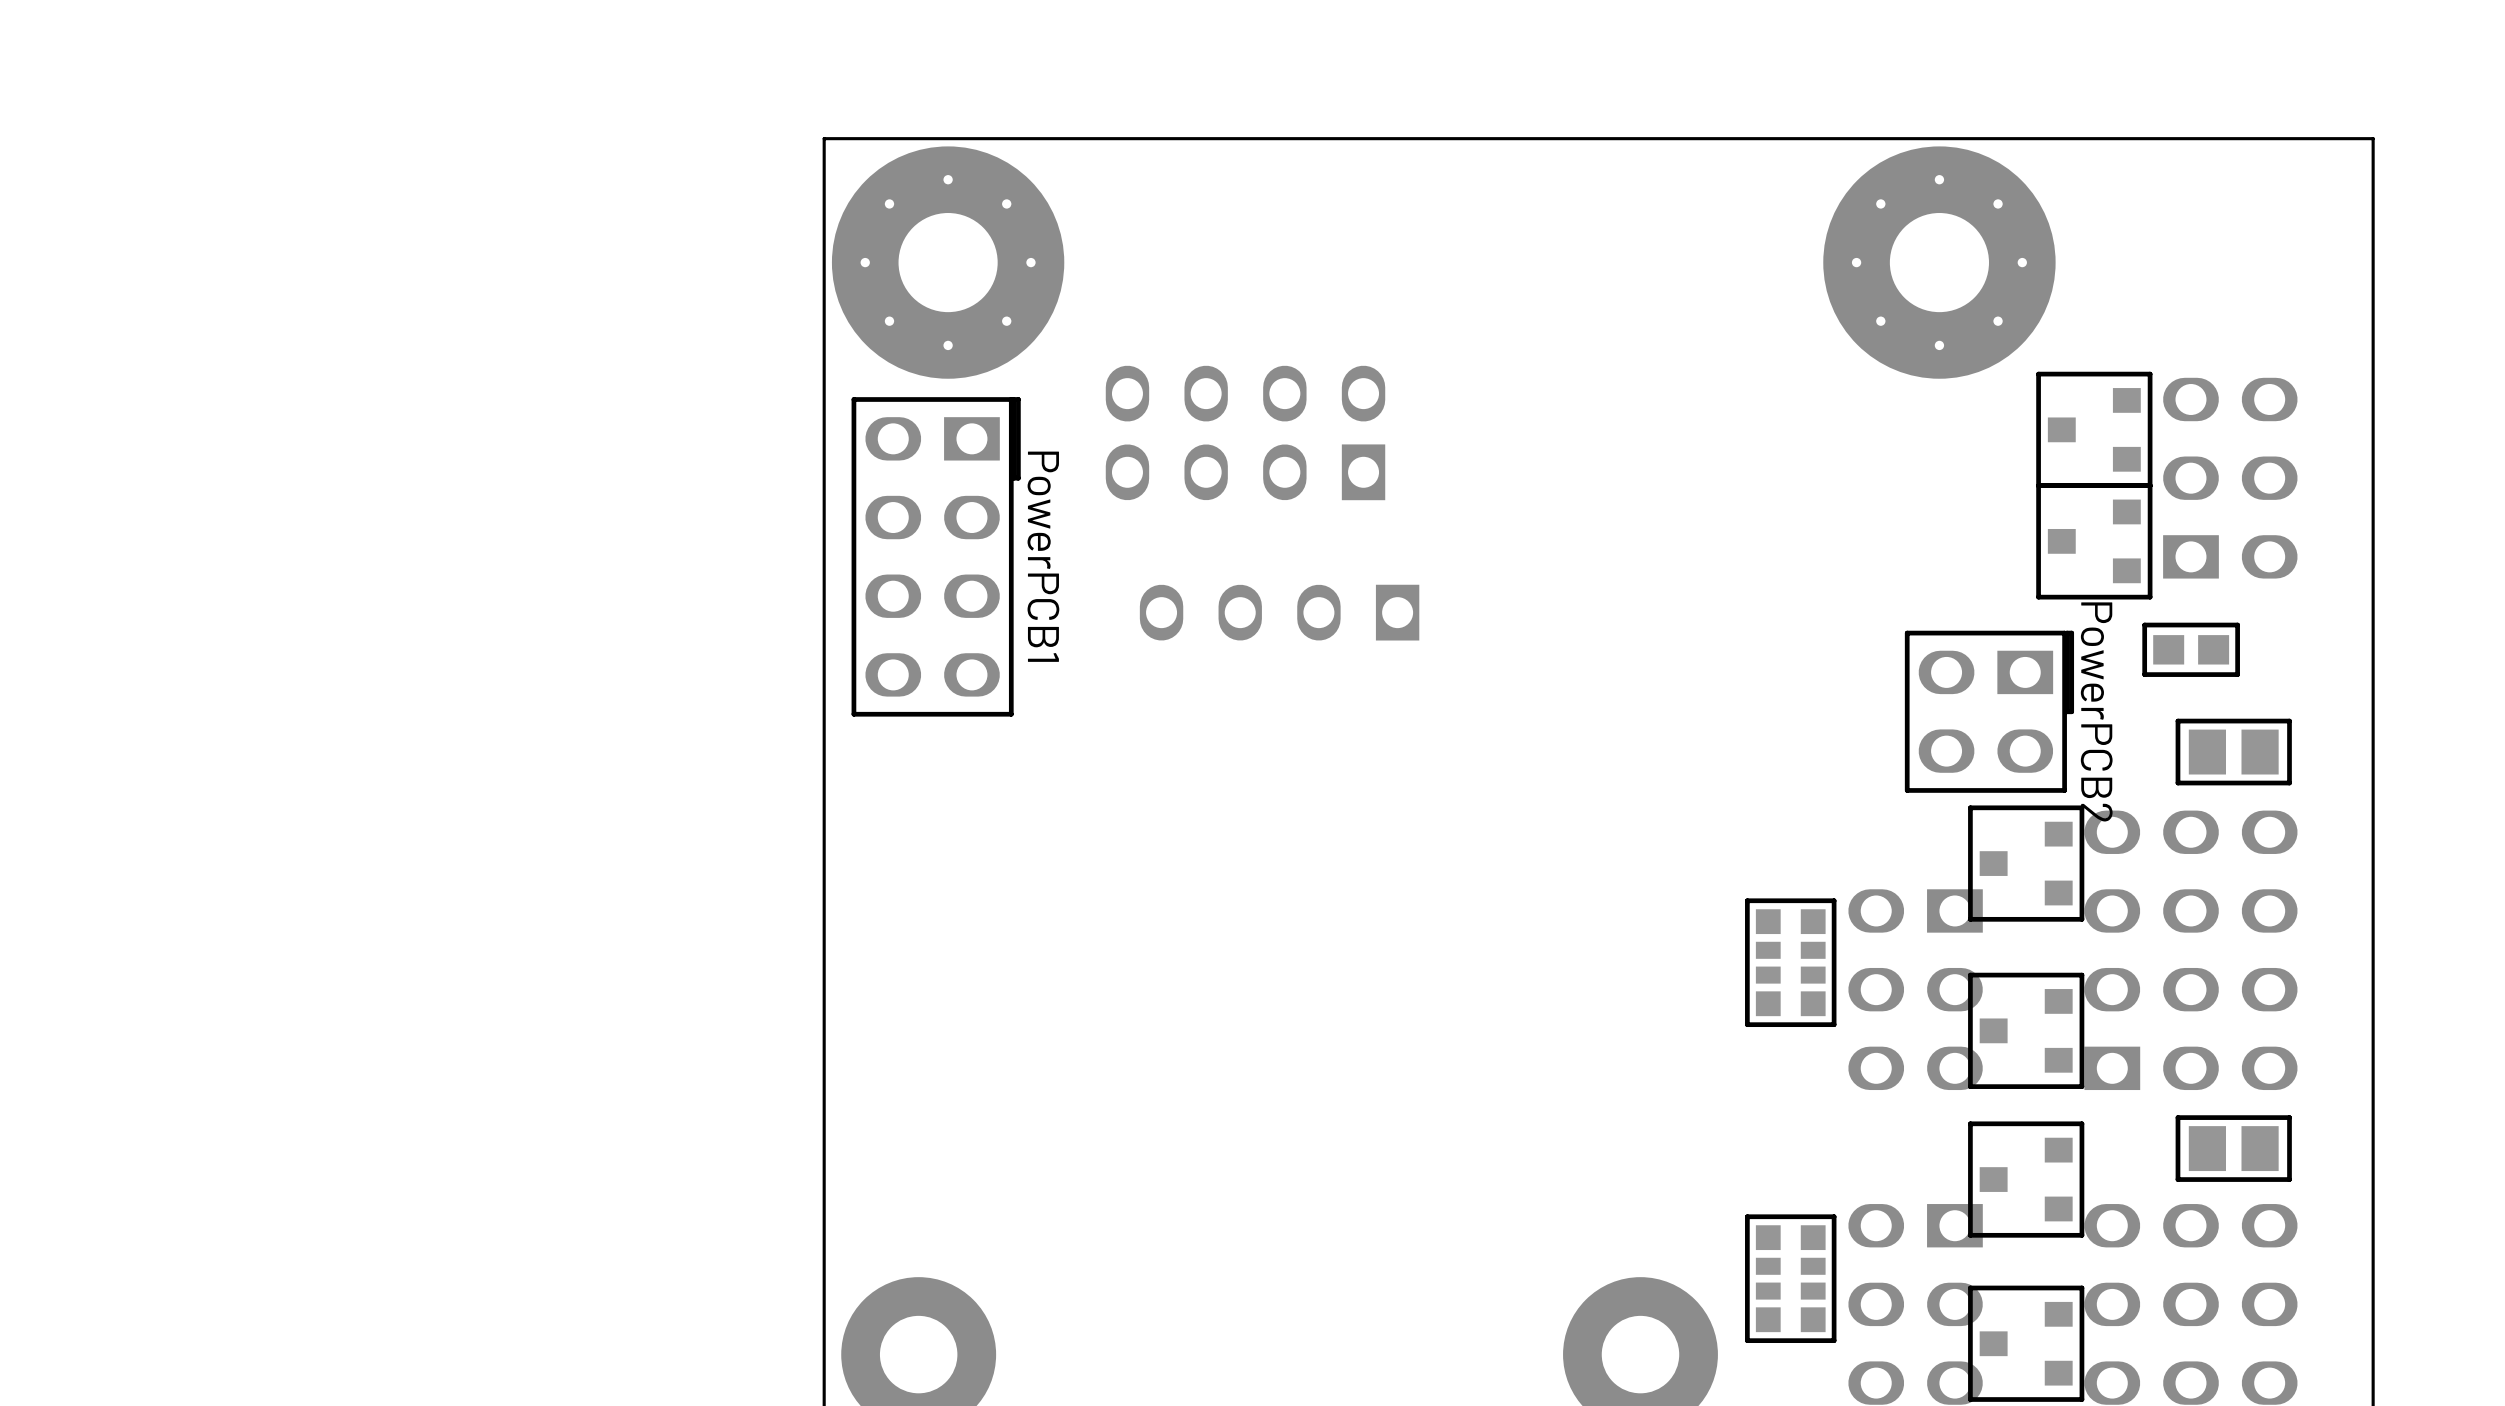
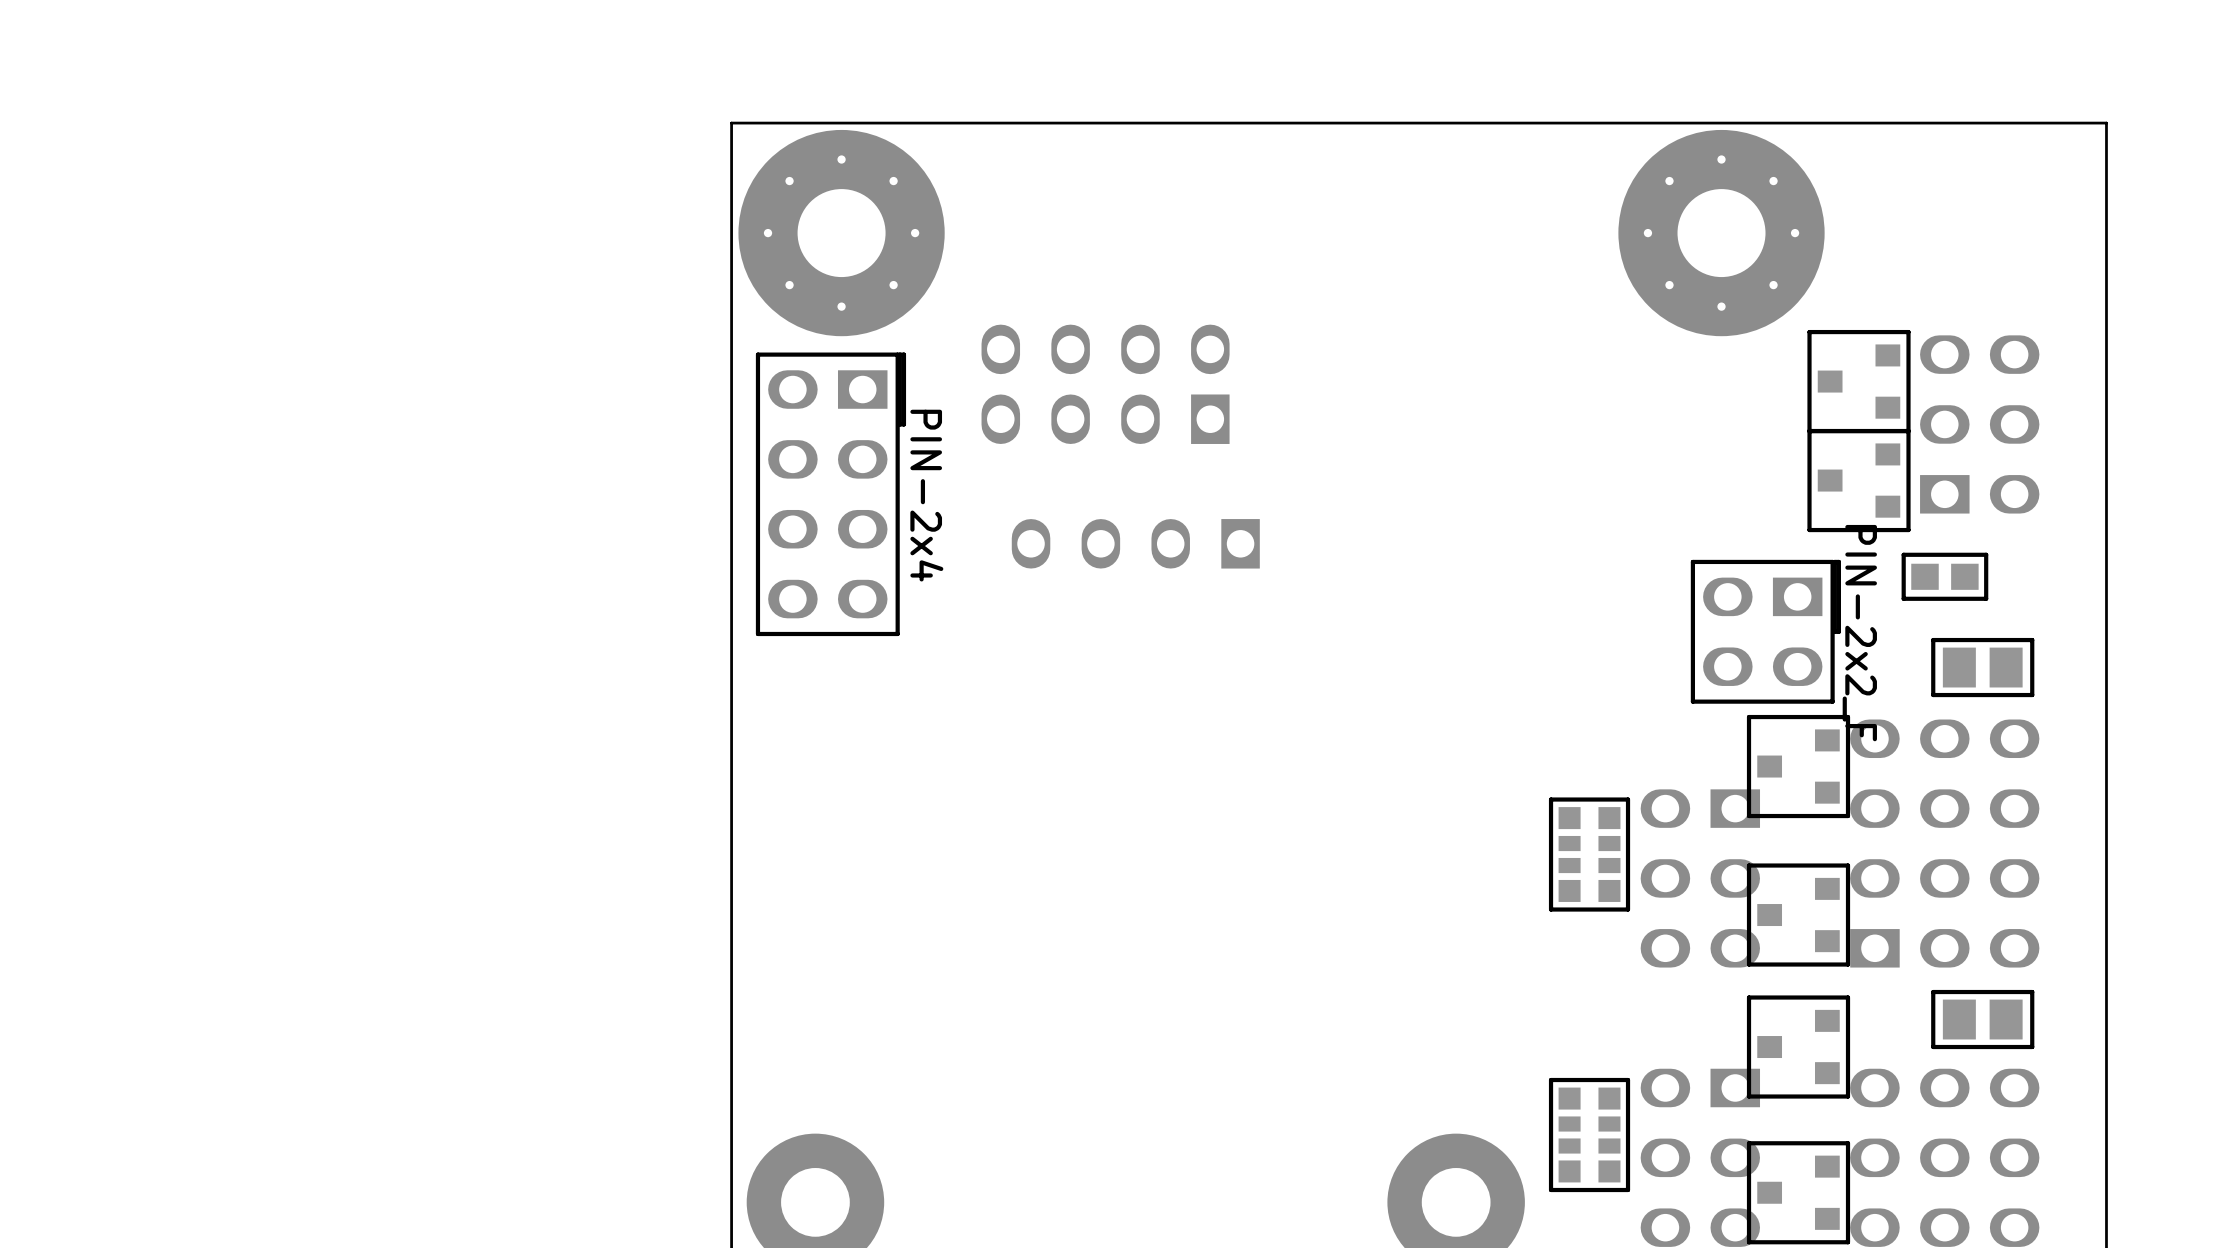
part value: PowerPCB1 (1043, 556) -> PIN-2x4 (926, 495)
part value: PowerPCB2 (2096, 712) -> PIN-2x2_F (1859, 633)

